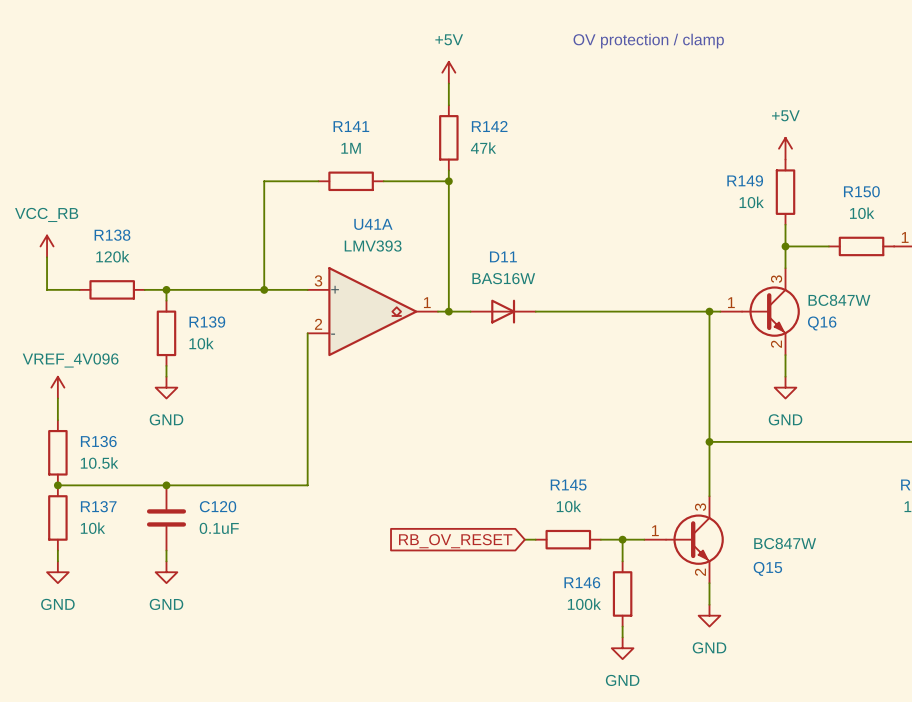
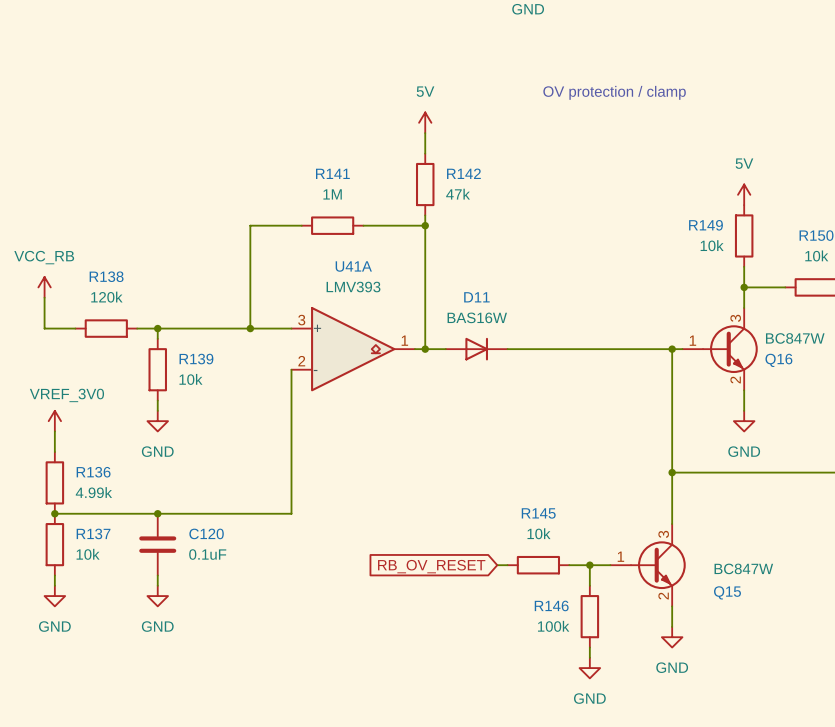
power symbol: +5V (448, 72) -> 5V (425, 122)
power symbol: +5V (785, 148) -> 5V (744, 194)
power symbol: VREF_4V096 (57, 387) -> VREF_3V0 (54, 421)
R136 value: 10.5k (99, 463) -> 4.99k (93, 492)

